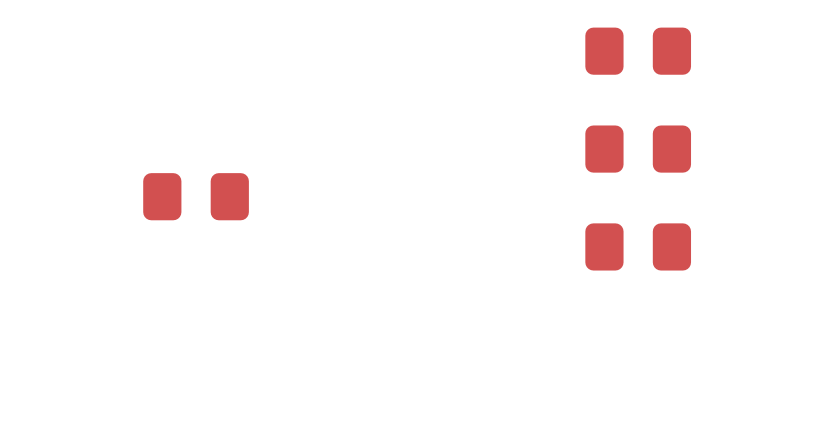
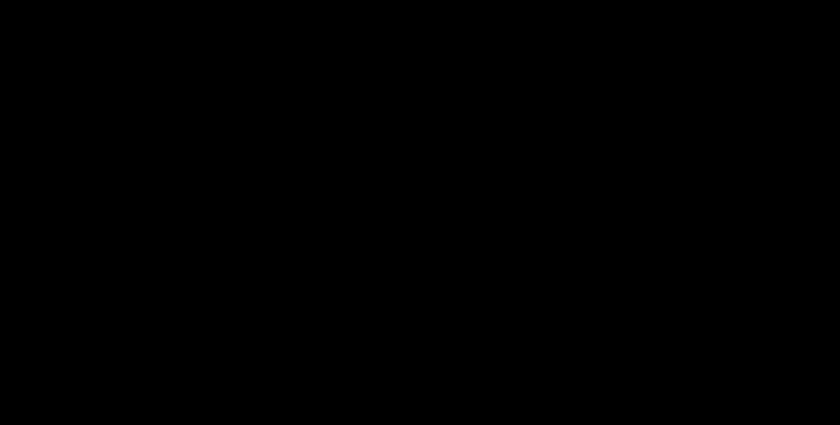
part: (638, 51) -> none
part: (638, 149) -> none
part: (196, 196) -> none
part: (638, 246) -> none

